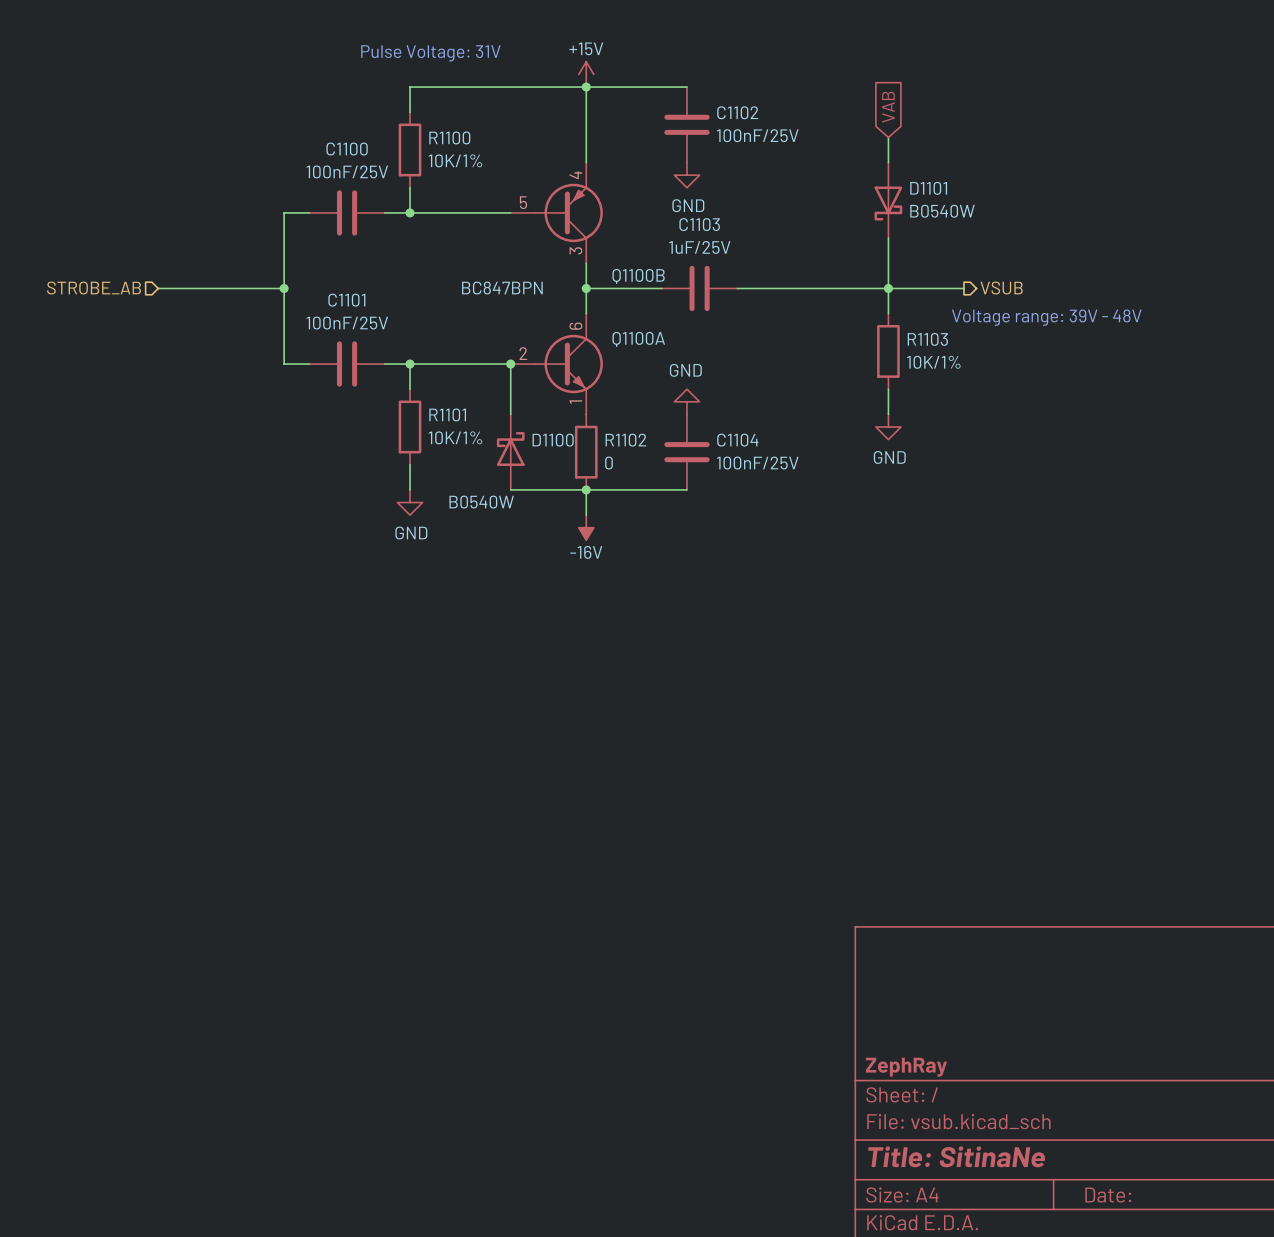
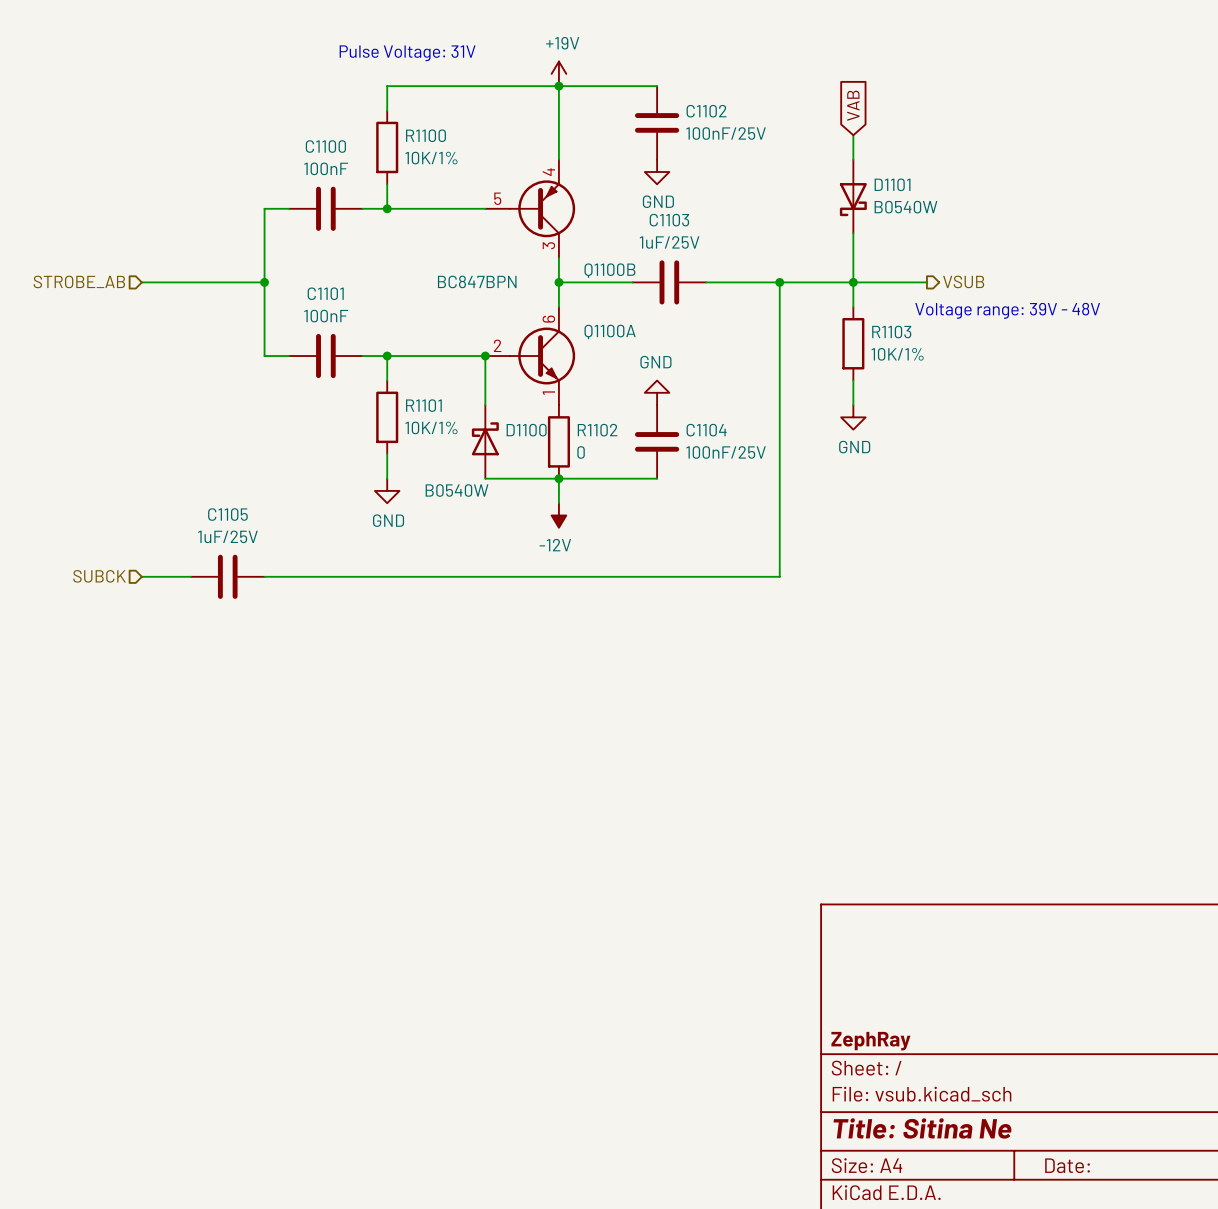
power symbol: +15V (586, 74) -> +19V (558, 73)
C1100 value: 100nF/25V (347, 171) -> 100nF (326, 168)
wire: none -> (779, 282) (779, 576) (264, 576)
junction: none -> (779, 282)
C1101 value: 100nF/25V (347, 323) -> 100nF (326, 316)
power symbol: -16V (586, 527) -> -12V (558, 515)
hierarchical label: none -> SUBCK (99, 576)
wire: none -> (141, 576) (190, 576)
C1105: none -> 1uF/25V (227, 576)
title block: Title: SitinaNe (956, 1156) -> Title: Sitina Ne (922, 1128)

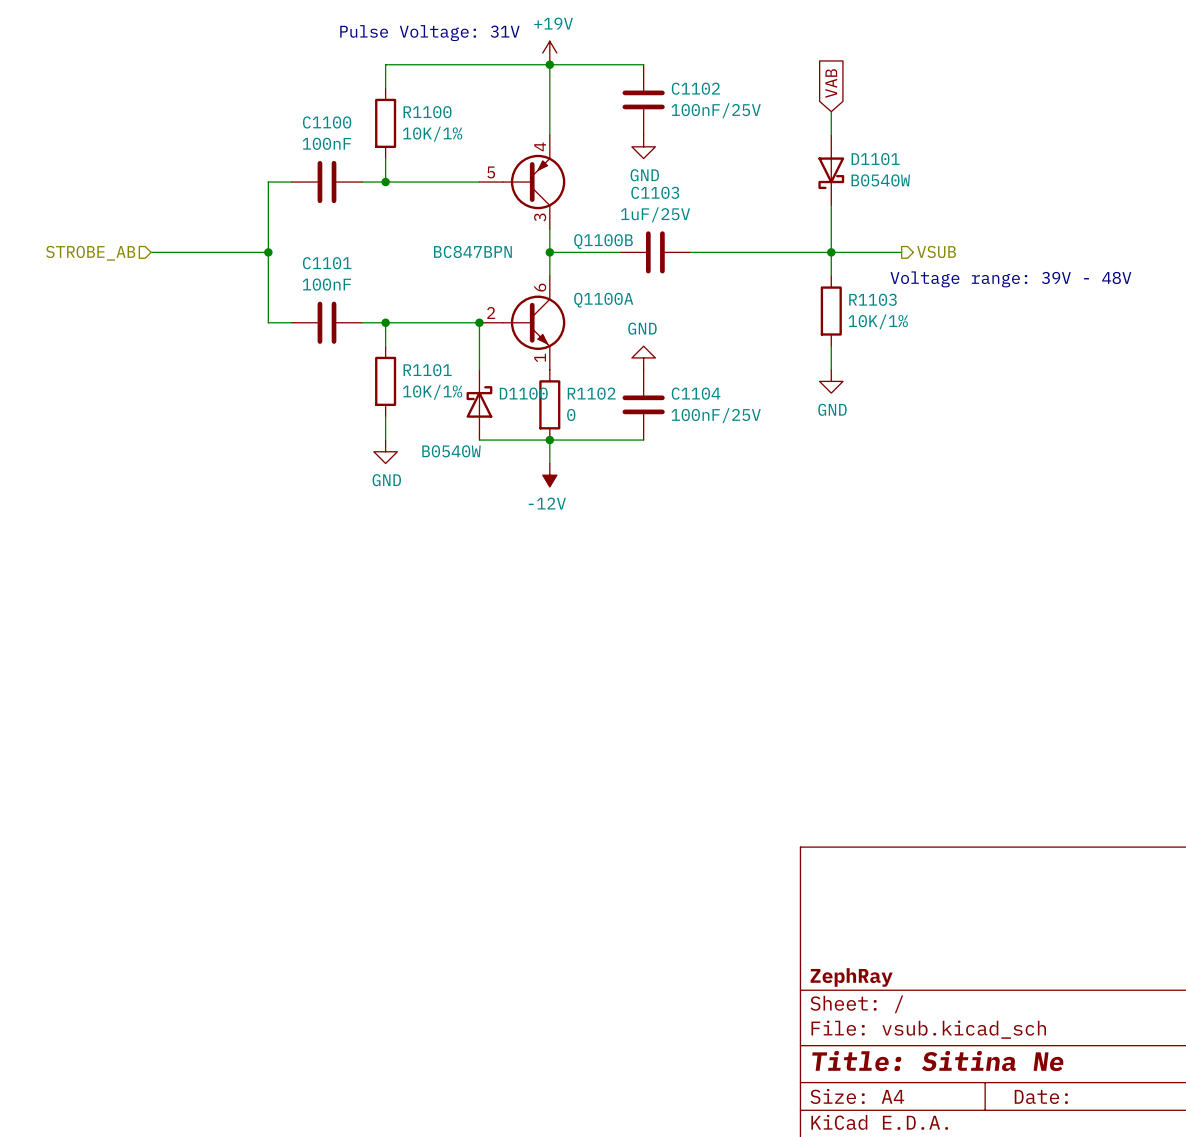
wire: (779, 282) (779, 576) (264, 576) -> none
junction: (779, 282) -> none
hierarchical label: SUBCK (99, 576) -> none
wire: (141, 576) (190, 576) -> none
C1105: 1uF/25V (227, 576) -> none

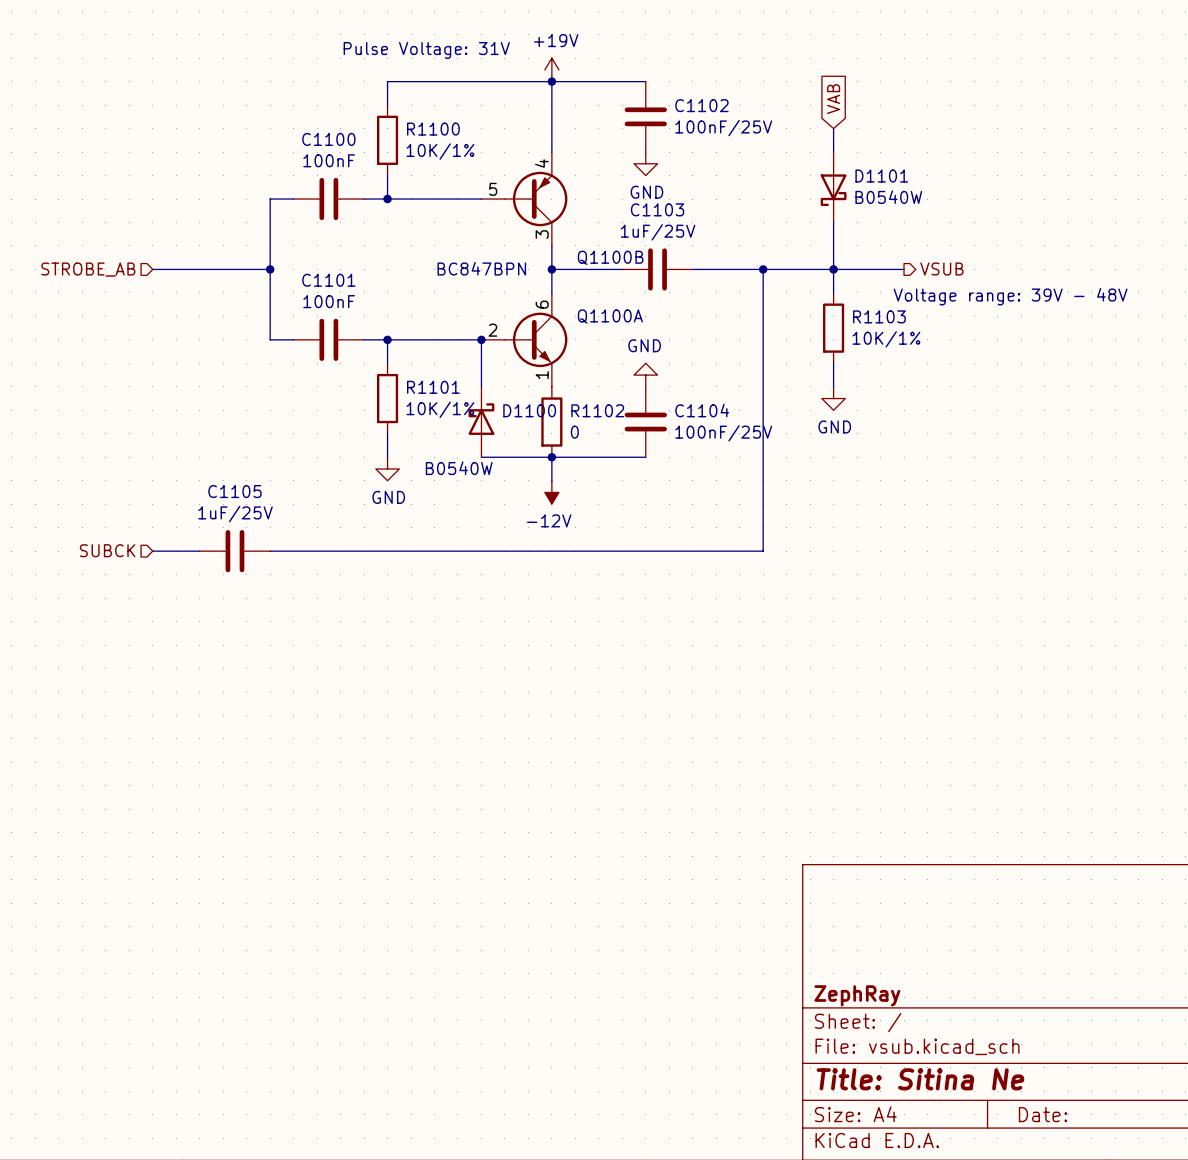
wire: none -> (763, 269) (763, 551) (270, 551)
junction: none -> (763, 269)
hierarchical label: none -> SUBCK (107, 550)
wire: none -> (152, 551) (199, 551)
C1105: none -> 1uF/25V (234, 551)

